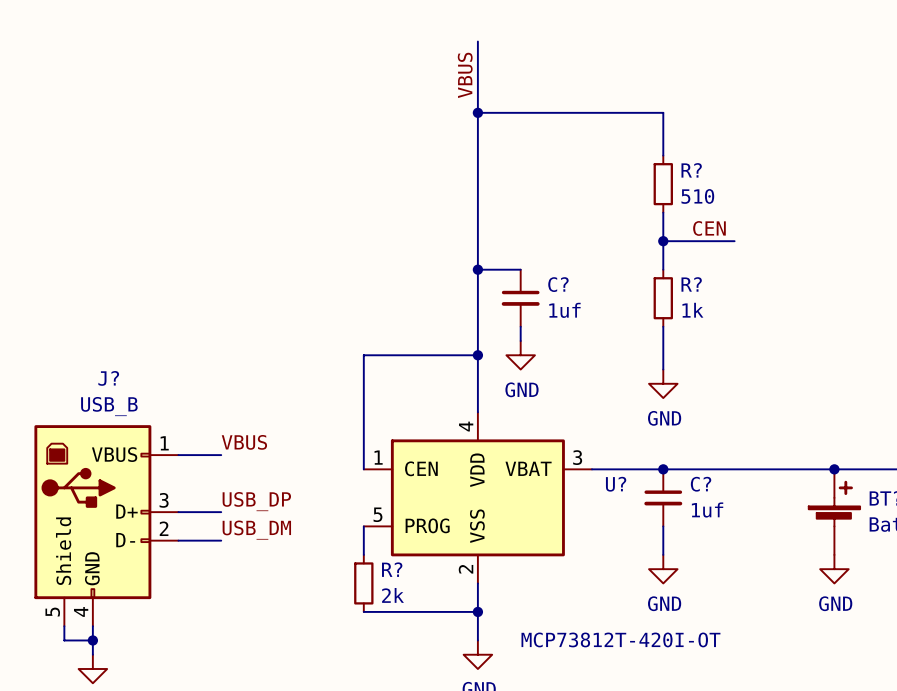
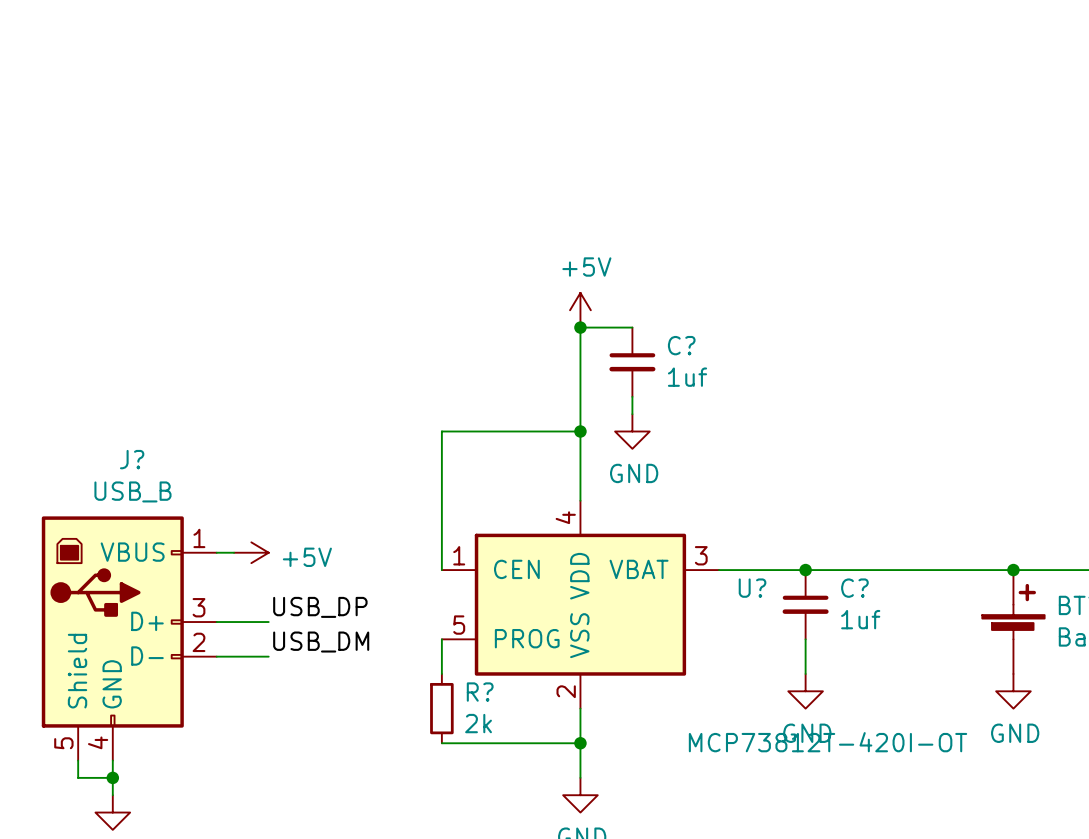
wire: (477, 41) (477, 269) -> none
label: VBUS (465, 75) -> none
wire: (477, 112) (663, 112) (663, 155) -> none
junction: (477, 112) -> none
R?: 510 (663, 184) -> none
wire: (663, 212) (663, 269) -> none
label: CEN (709, 228) -> none
wire: (663, 241) (734, 241) -> none
junction: (663, 241) -> none
power symbol: none -> +5V (580, 310)
R?: 1k (663, 298) -> none
wire: (663, 326) (663, 369) -> none
power symbol: GND (663, 383) -> none
label: VBUS (244, 442) -> none
power symbol: none -> +5V (251, 552)
U? value position: MCP73812T-420I-OT (620, 639) -> MCP73812T-420I-OT (828, 742)

